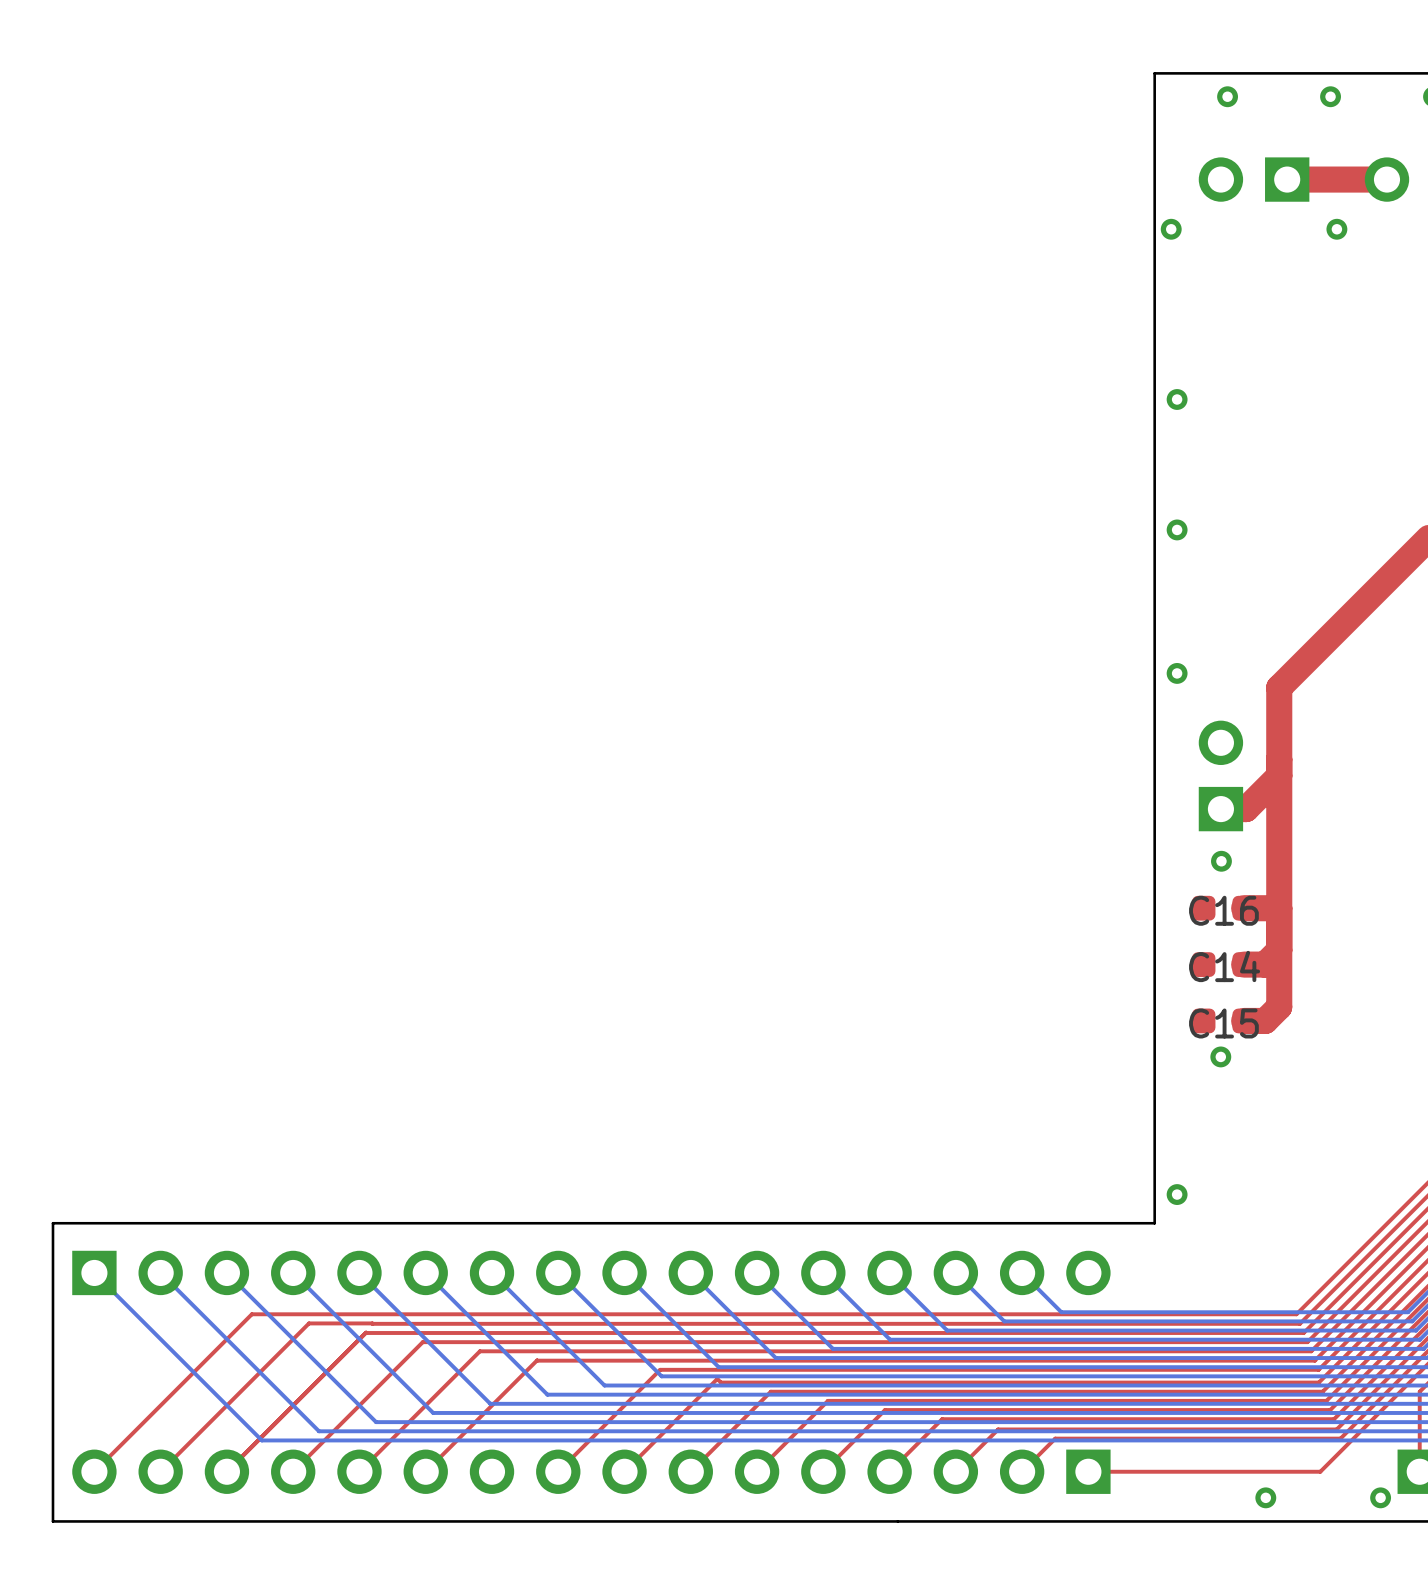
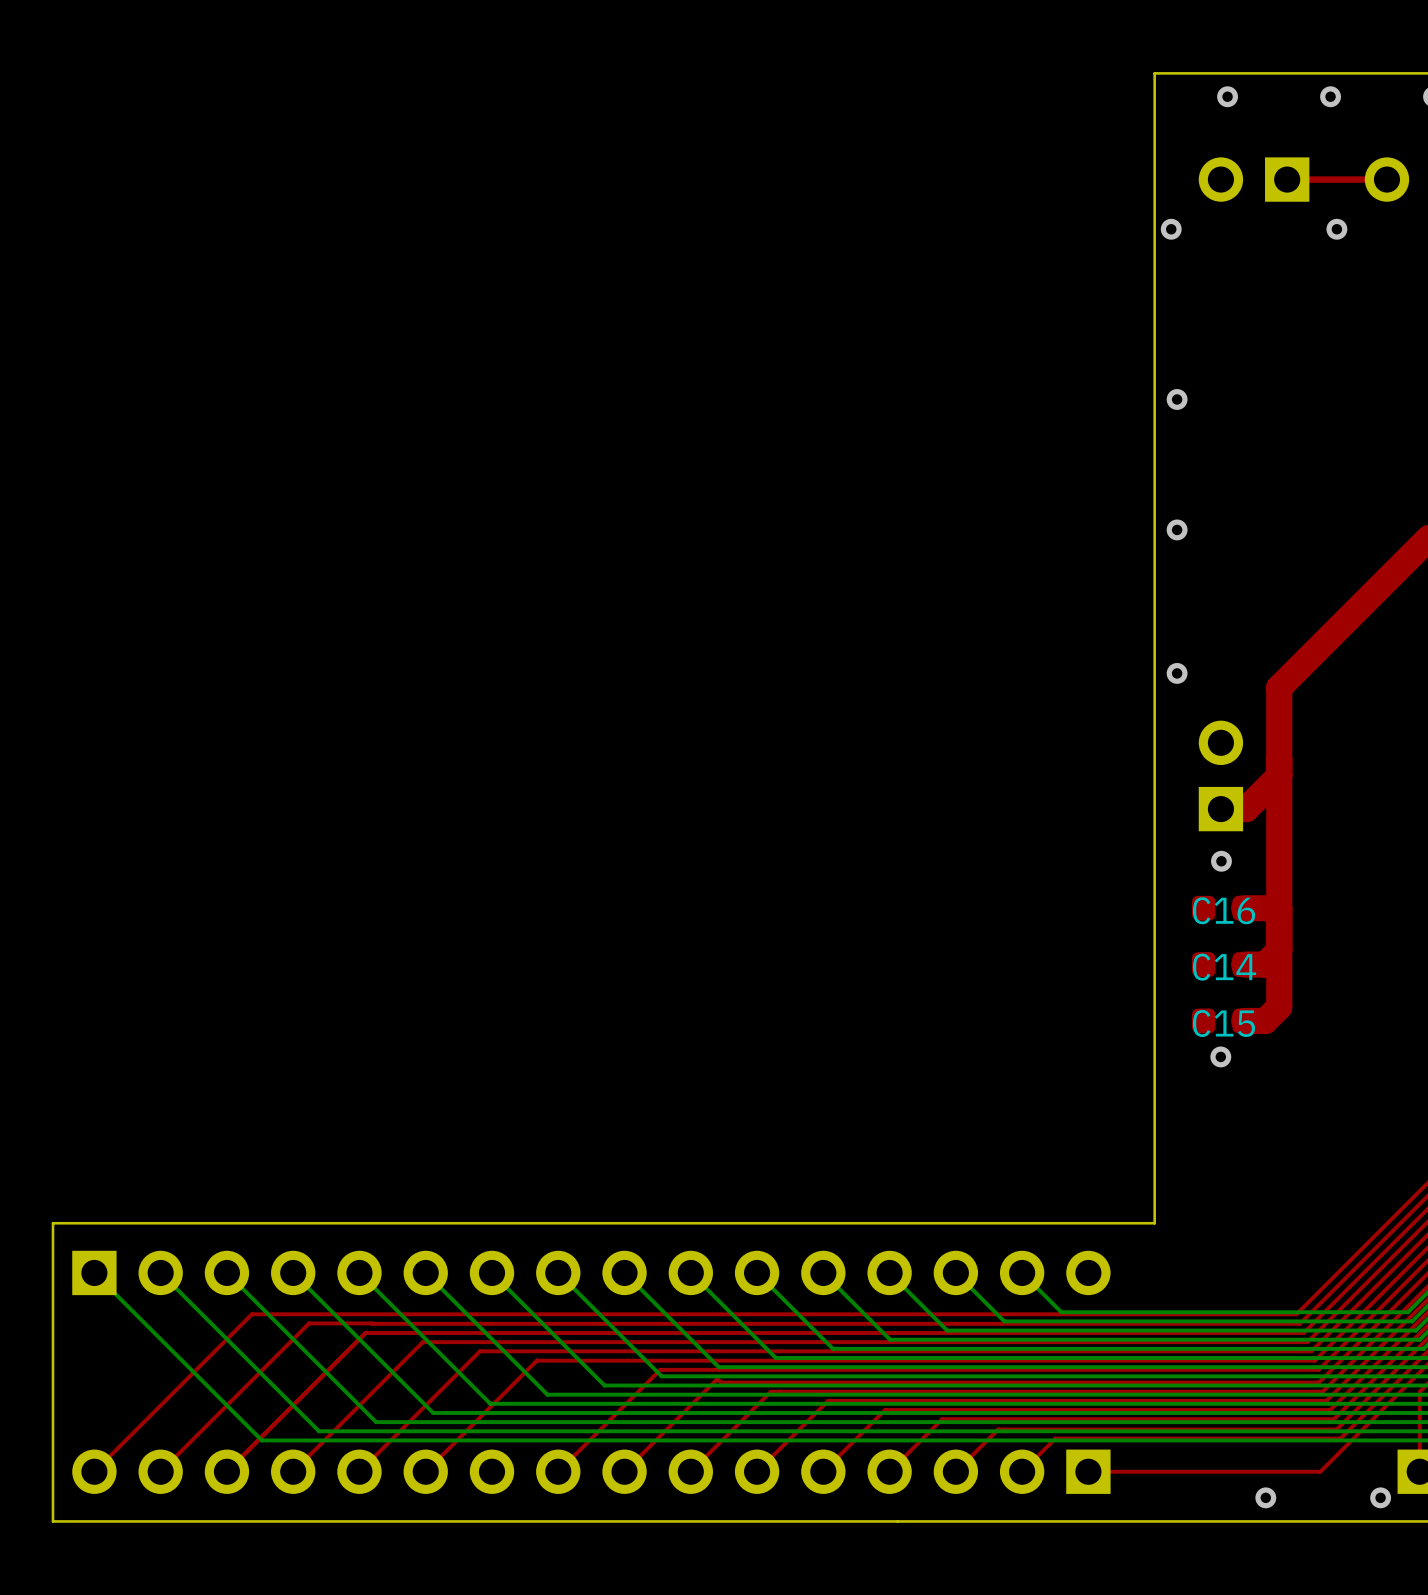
top track width: thick (1386, 179) (1287, 179) -> thin (1386, 179) (1287, 179)
via: (1177, 1194) -> none

